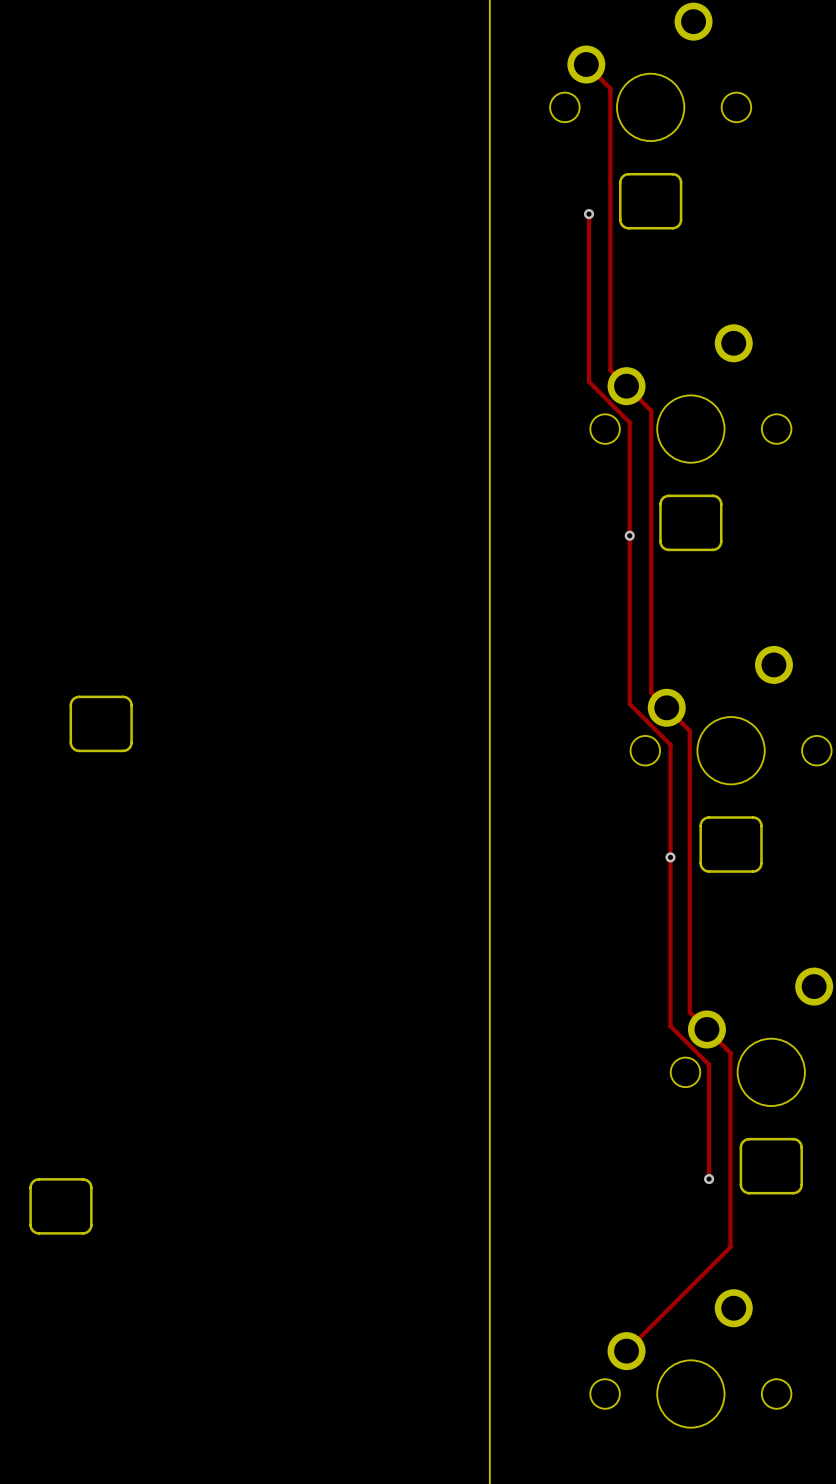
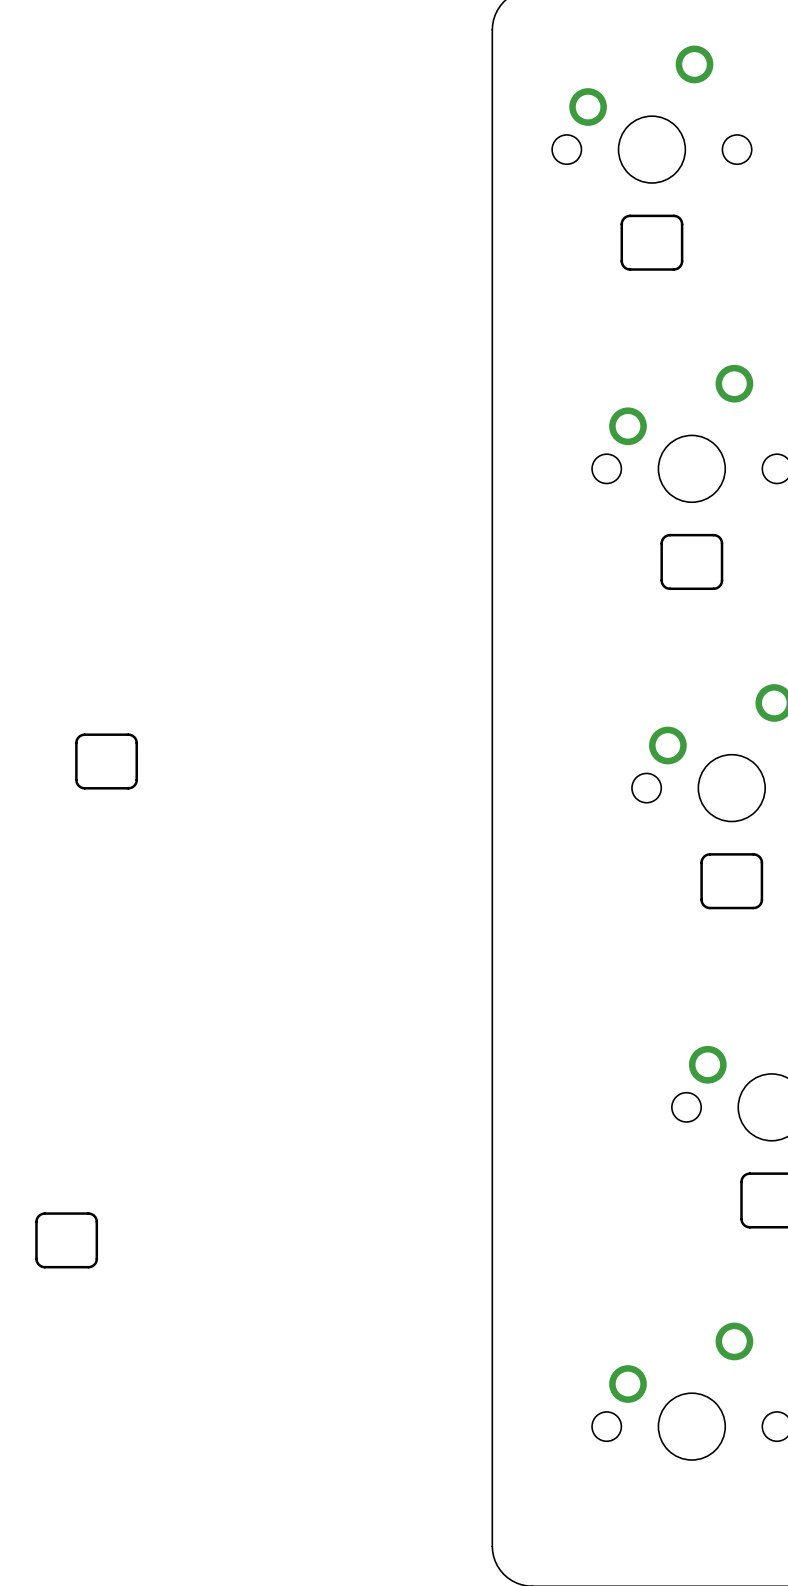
track: (586, 64) (610, 88) (610, 370) (651, 410) (651, 692) (689, 730) (689, 1012) (730, 1053) (730, 1247) (626, 1351) -> none
track: (589, 214) (589, 381) (629, 422) (629, 704) (670, 744) (670, 1026) (709, 1064) (709, 1179) -> none
via: (589, 214) -> none
via: (629, 535) -> none
via: (670, 857) -> none
via: (709, 1179) -> none

